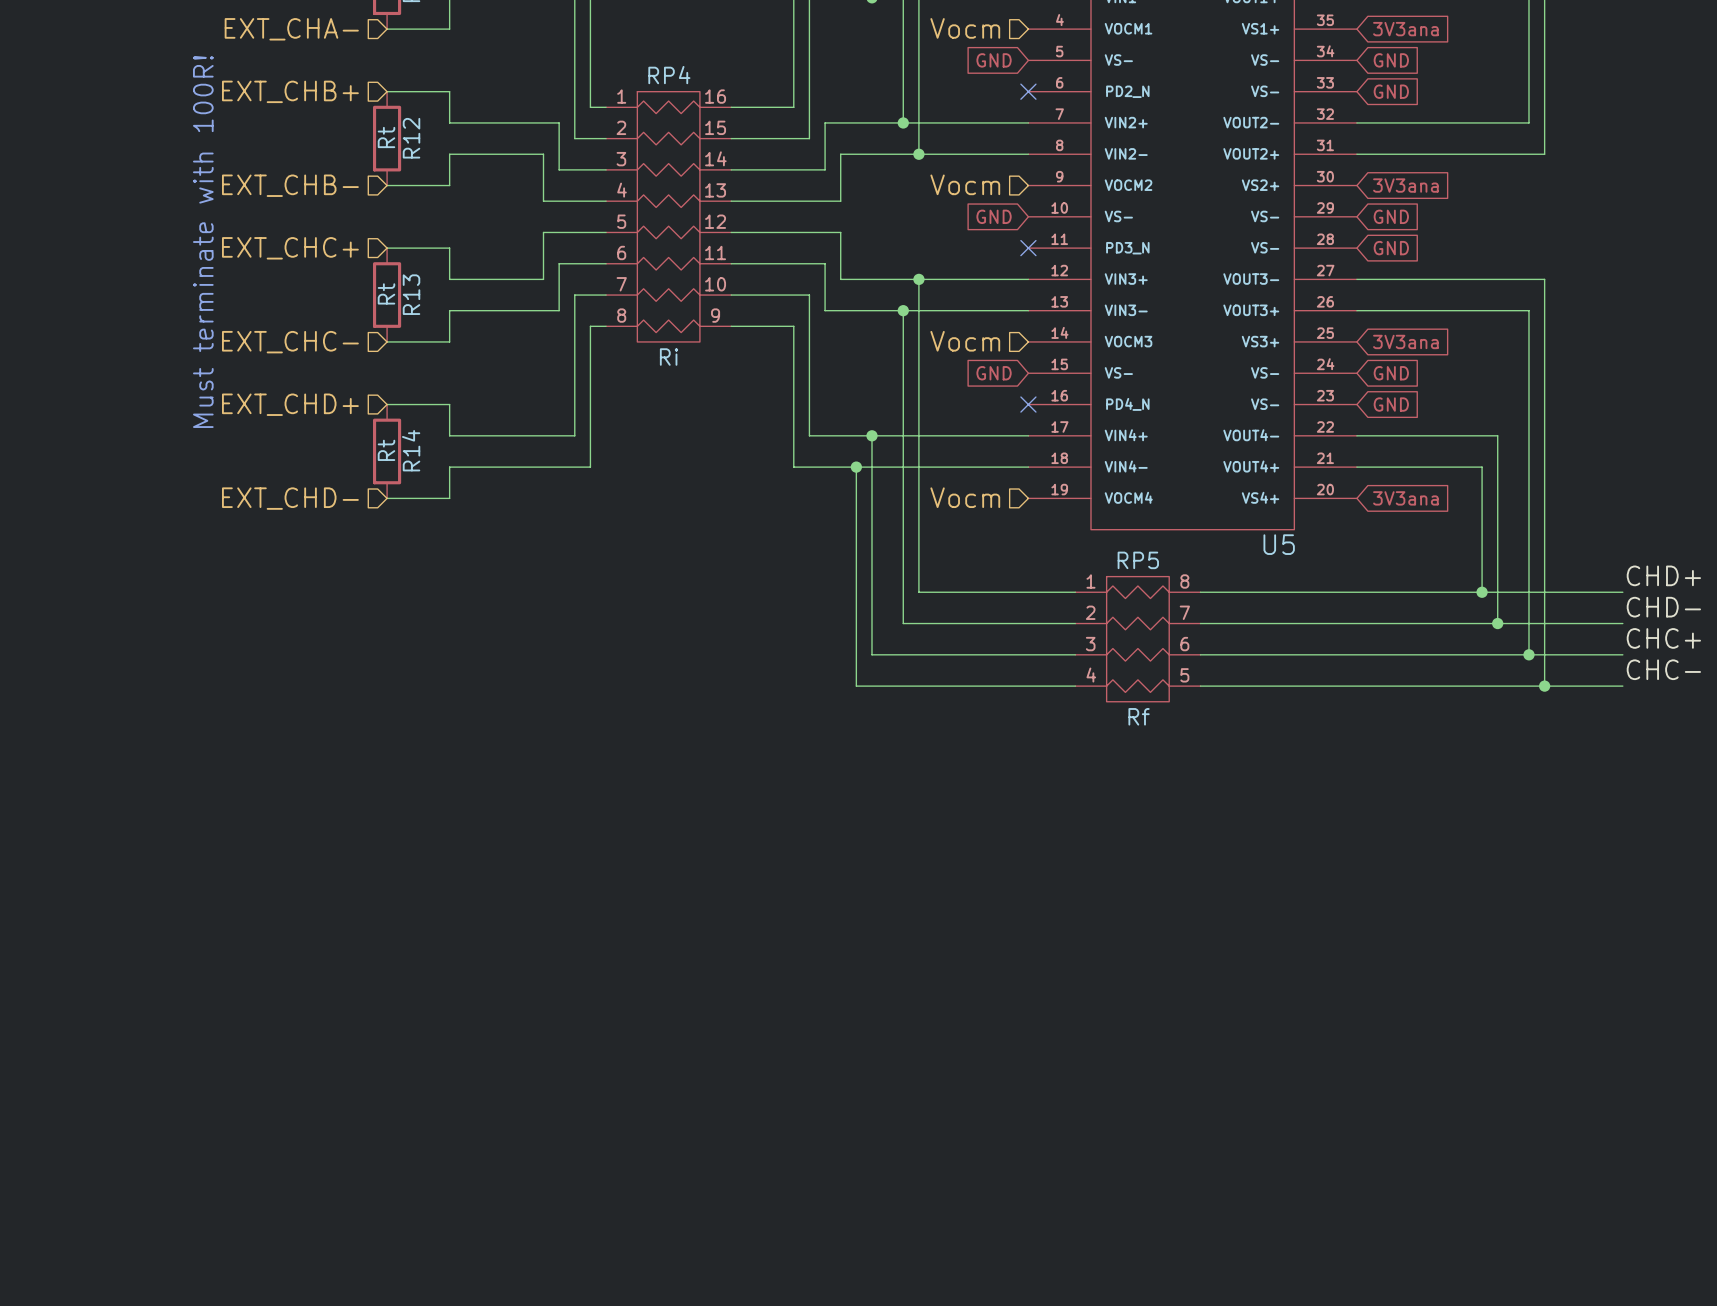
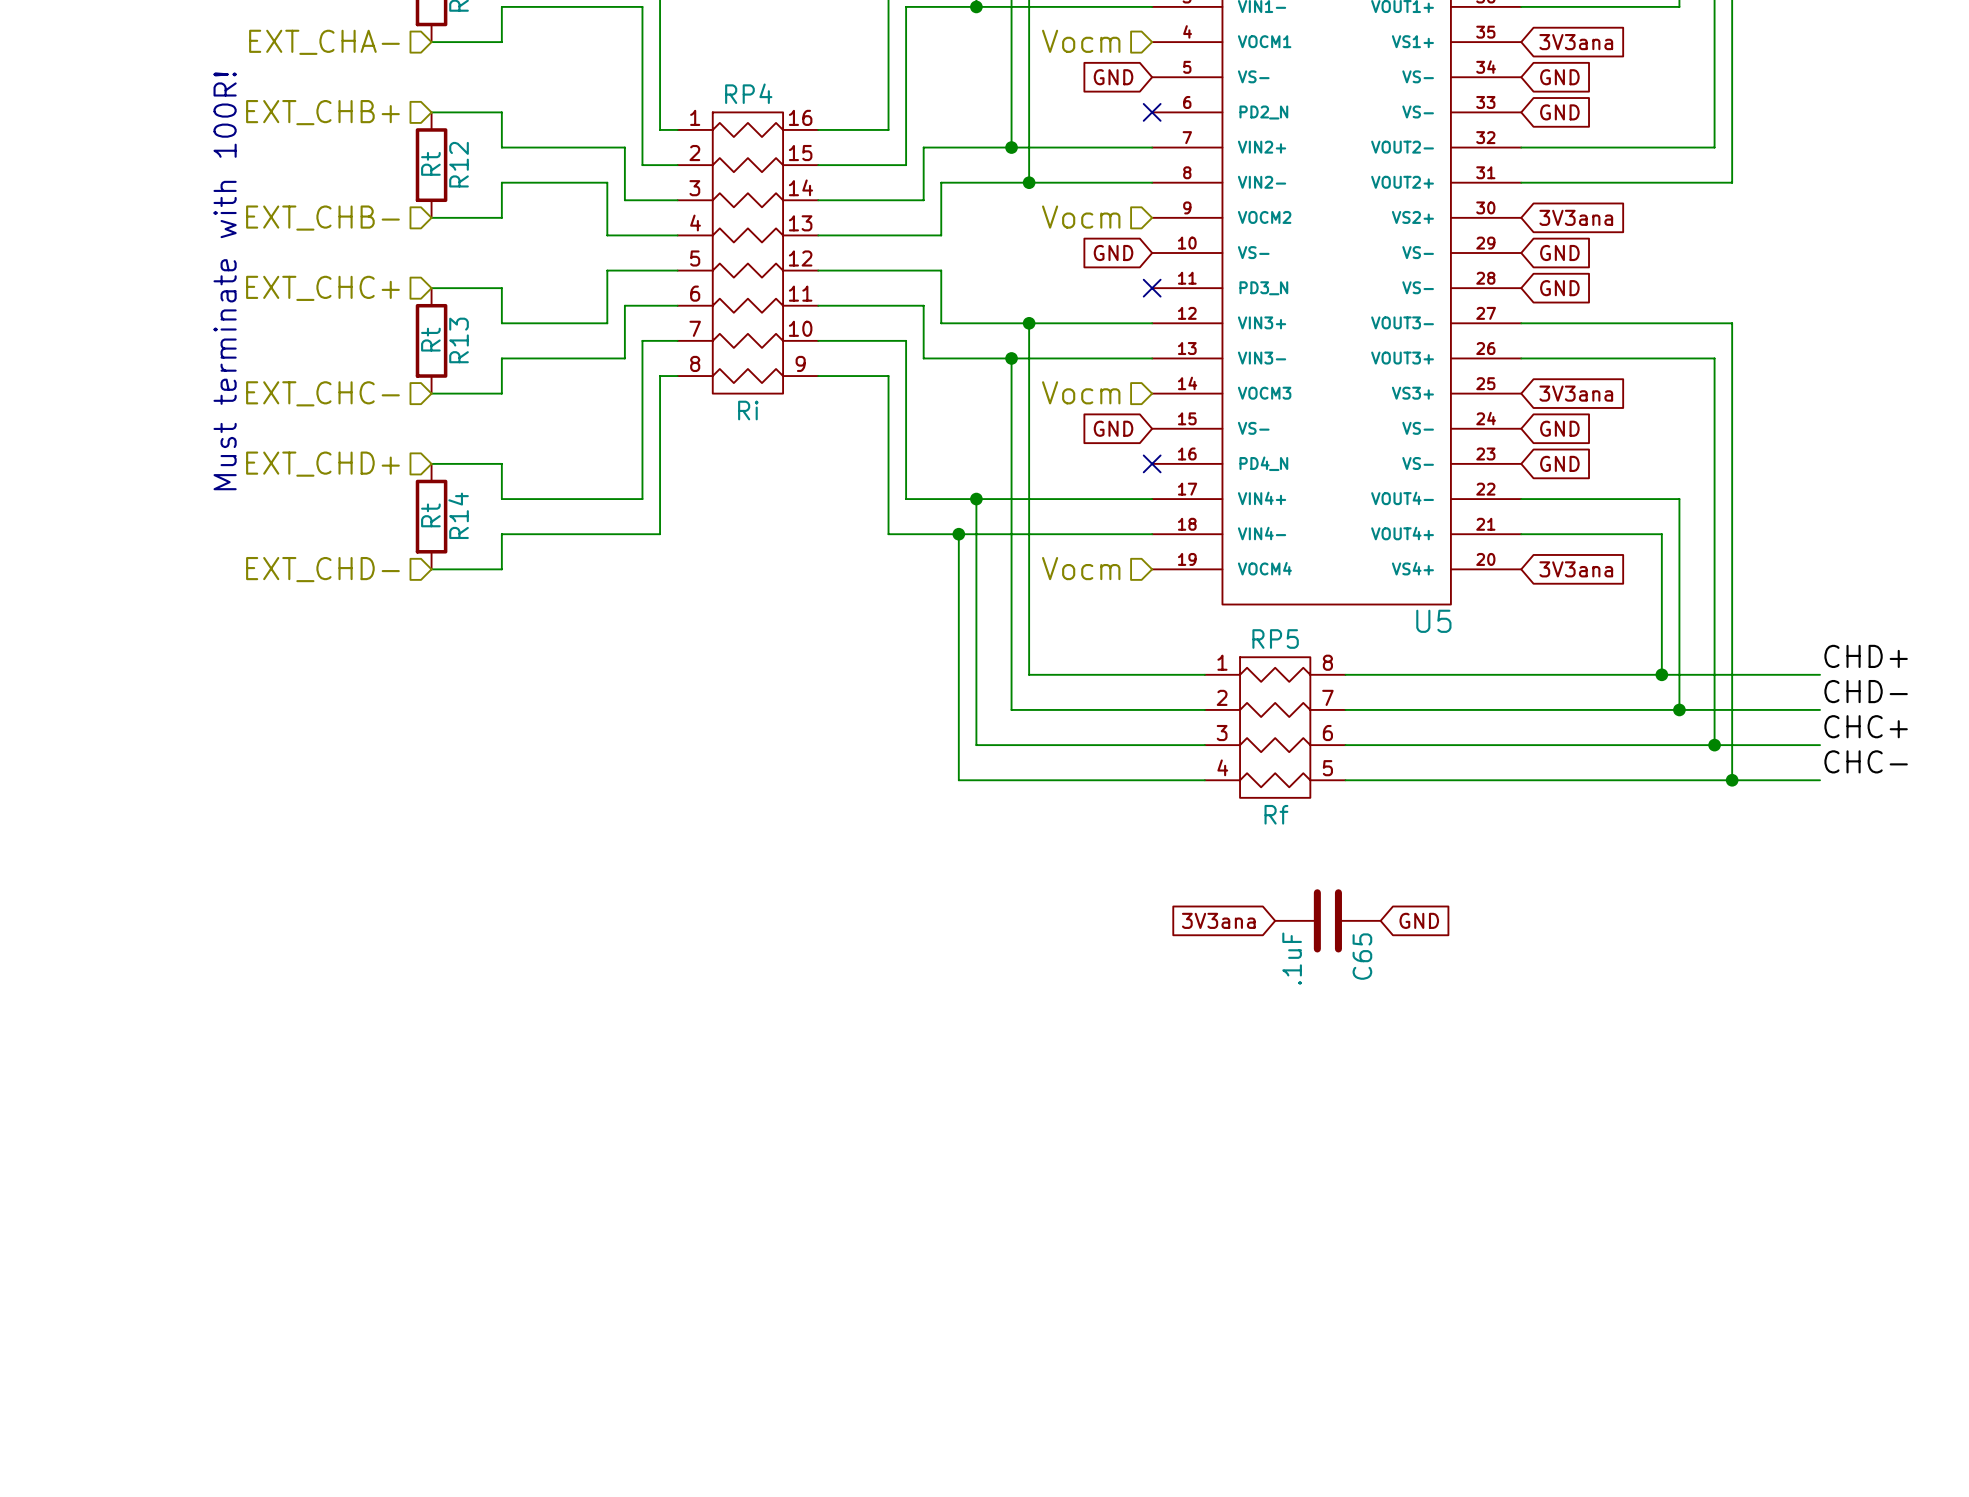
global label: none -> 3V3ana (1218, 920)
C65: none -> .1uF (1327, 920)
global label: none -> GND (1419, 920)

